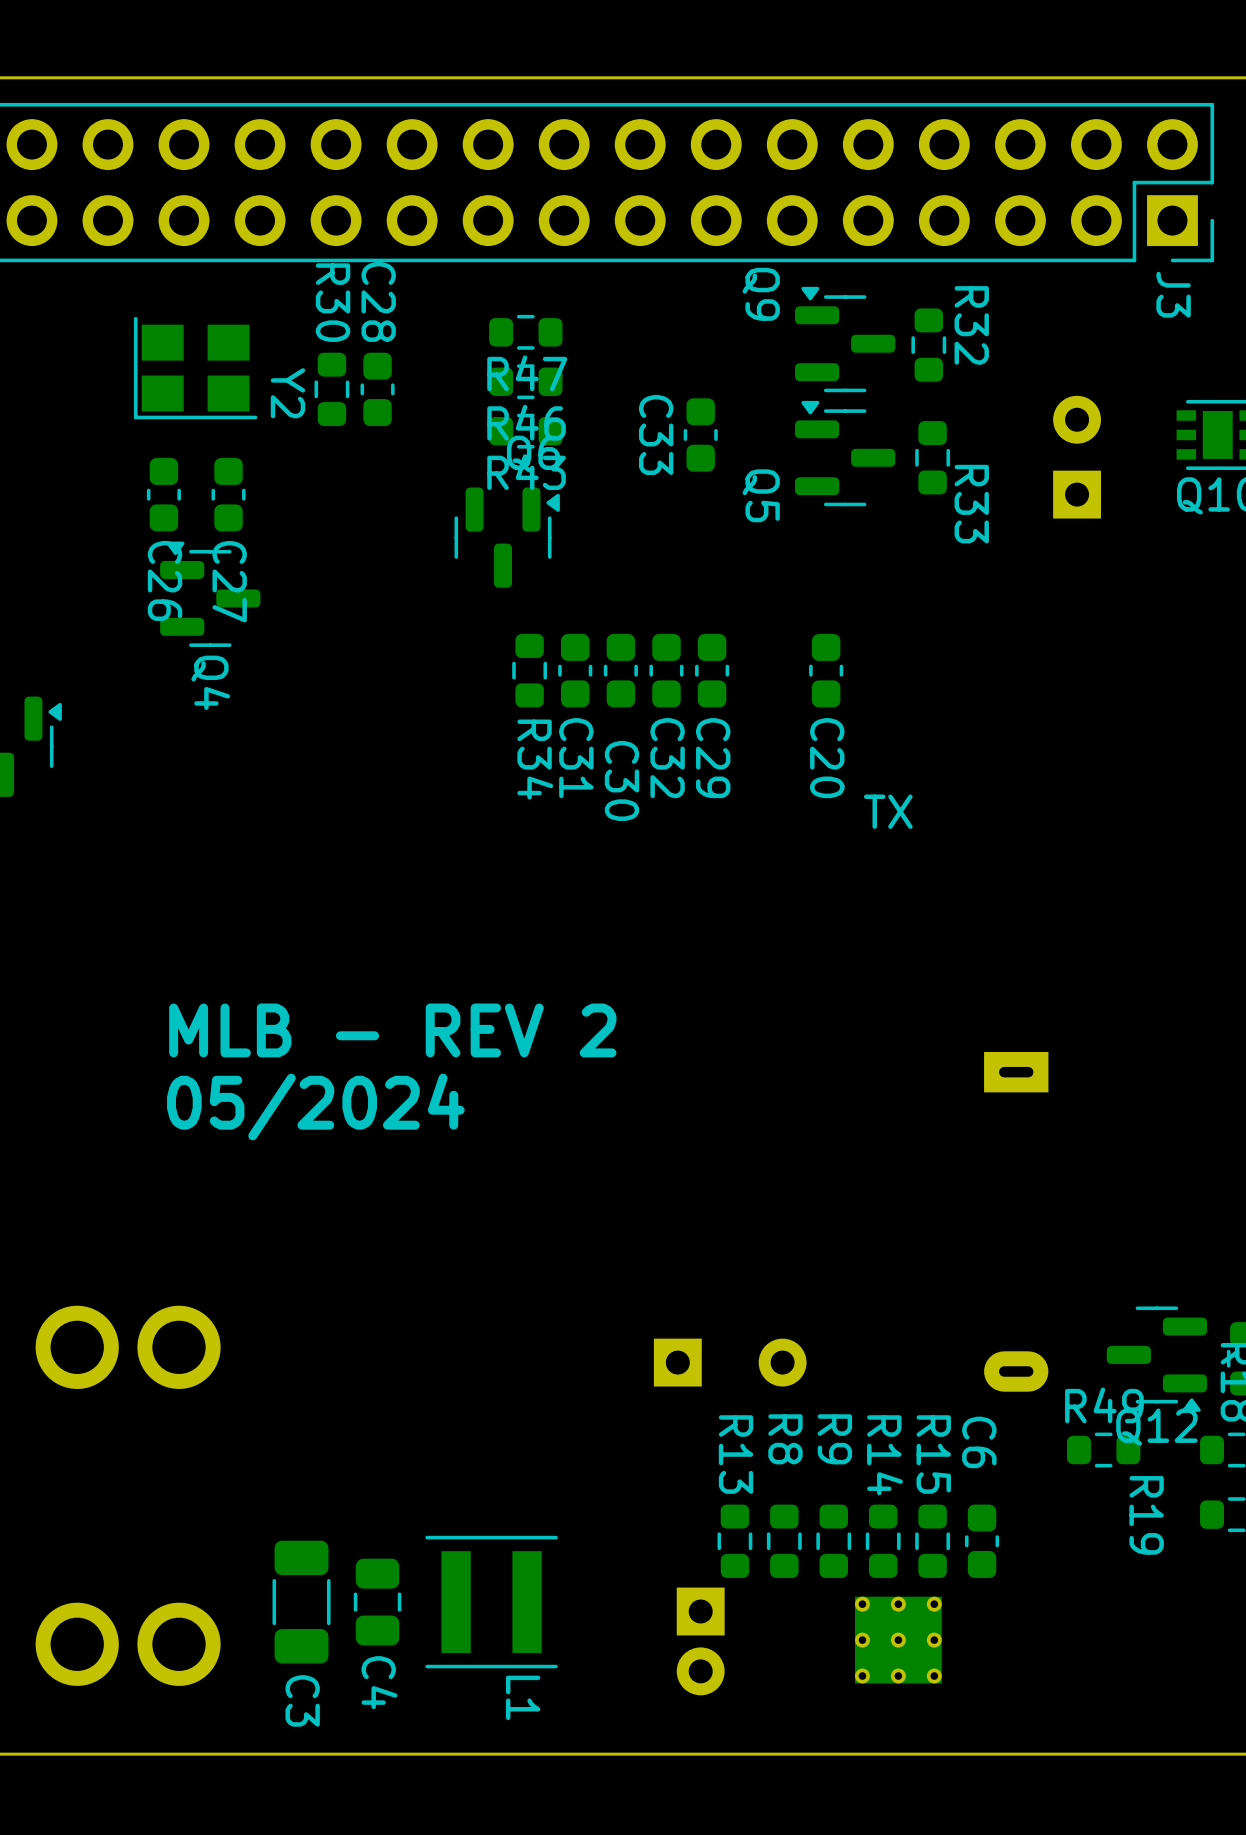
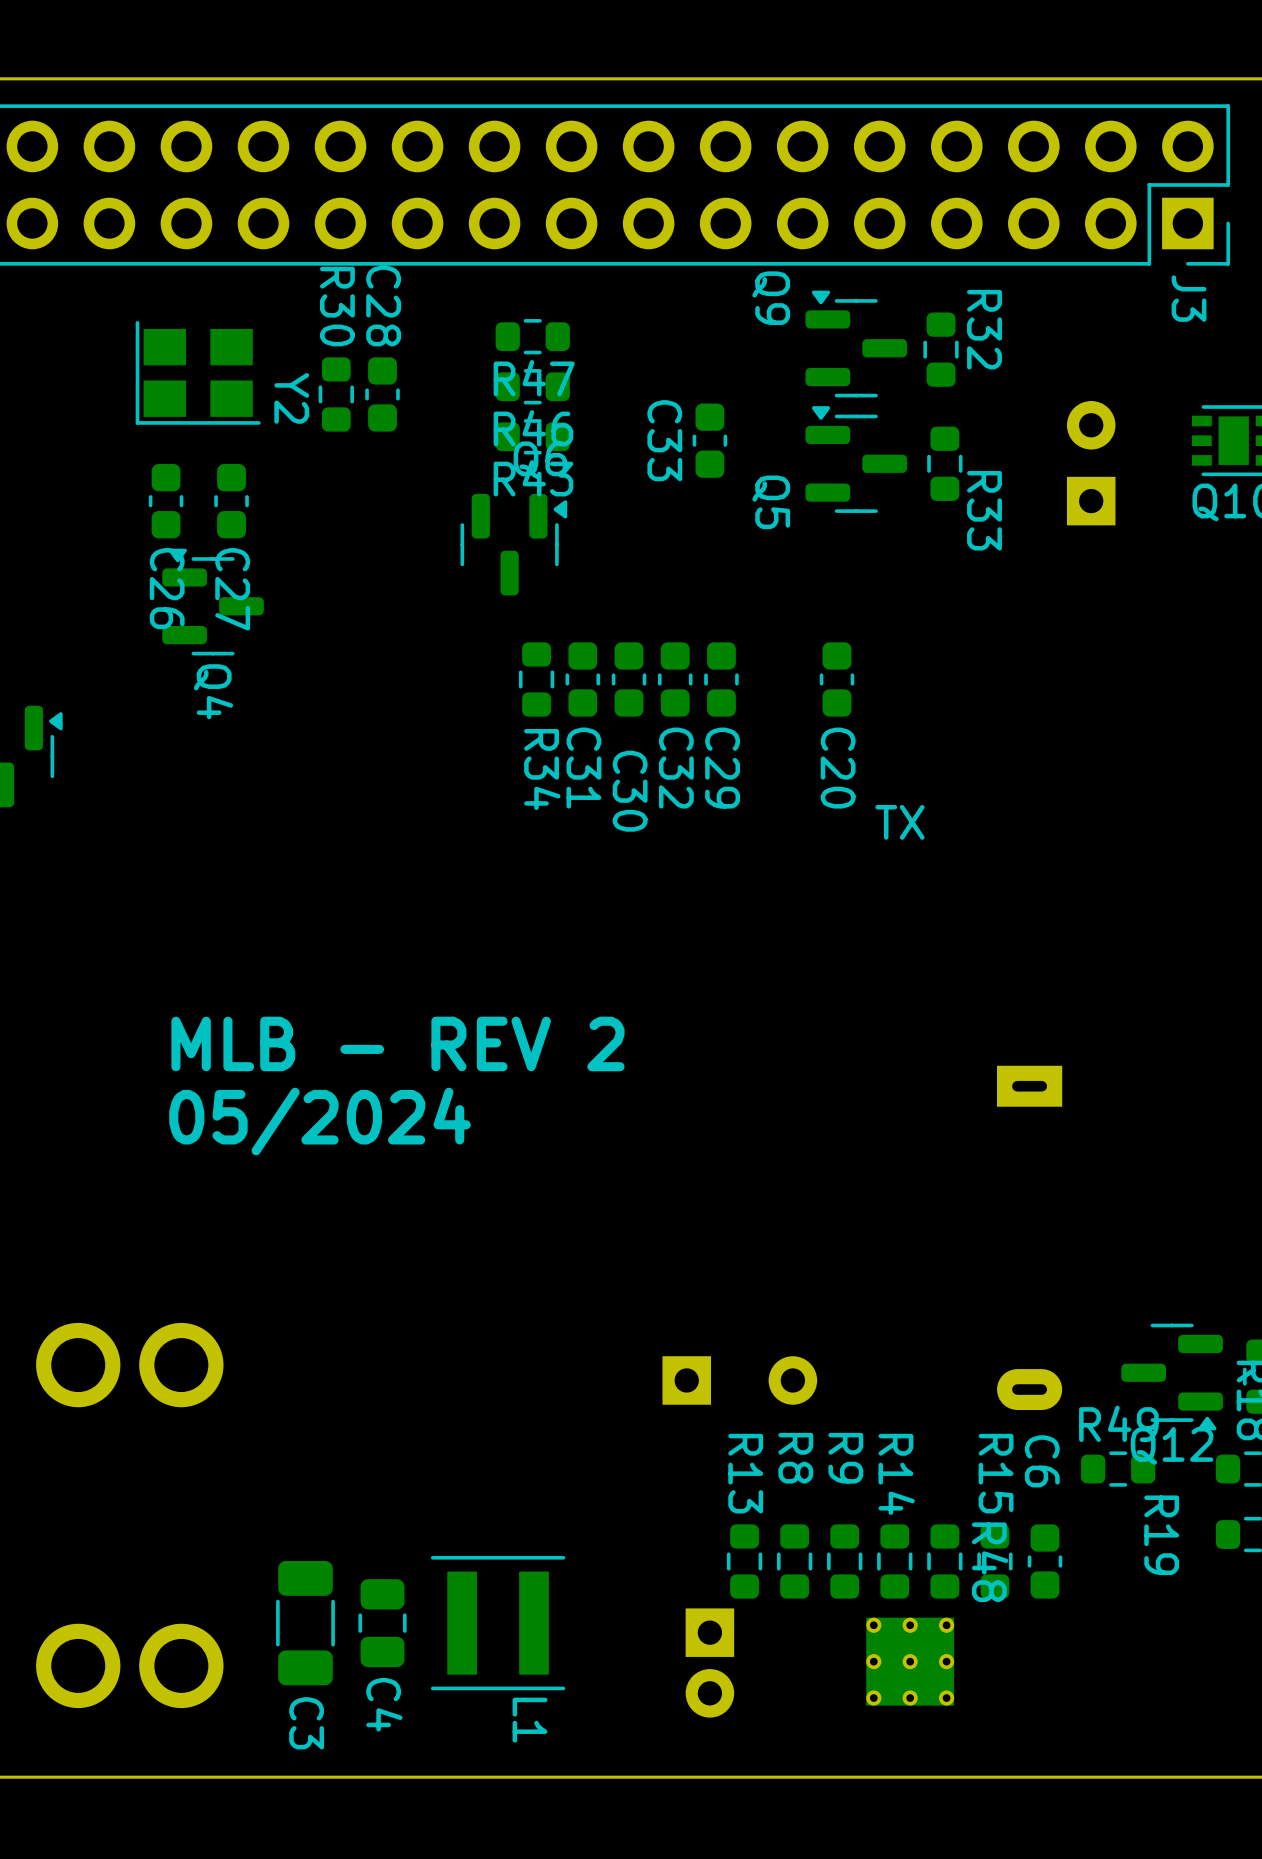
R15 name: R15 (933, 1454) -> R48 (990, 1562)
C6 position: (982, 1541) -> (1045, 1561)
R15: none -> (994, 1561)

